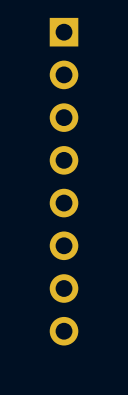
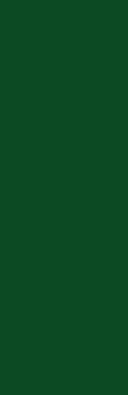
part: (64, 181) -> none

